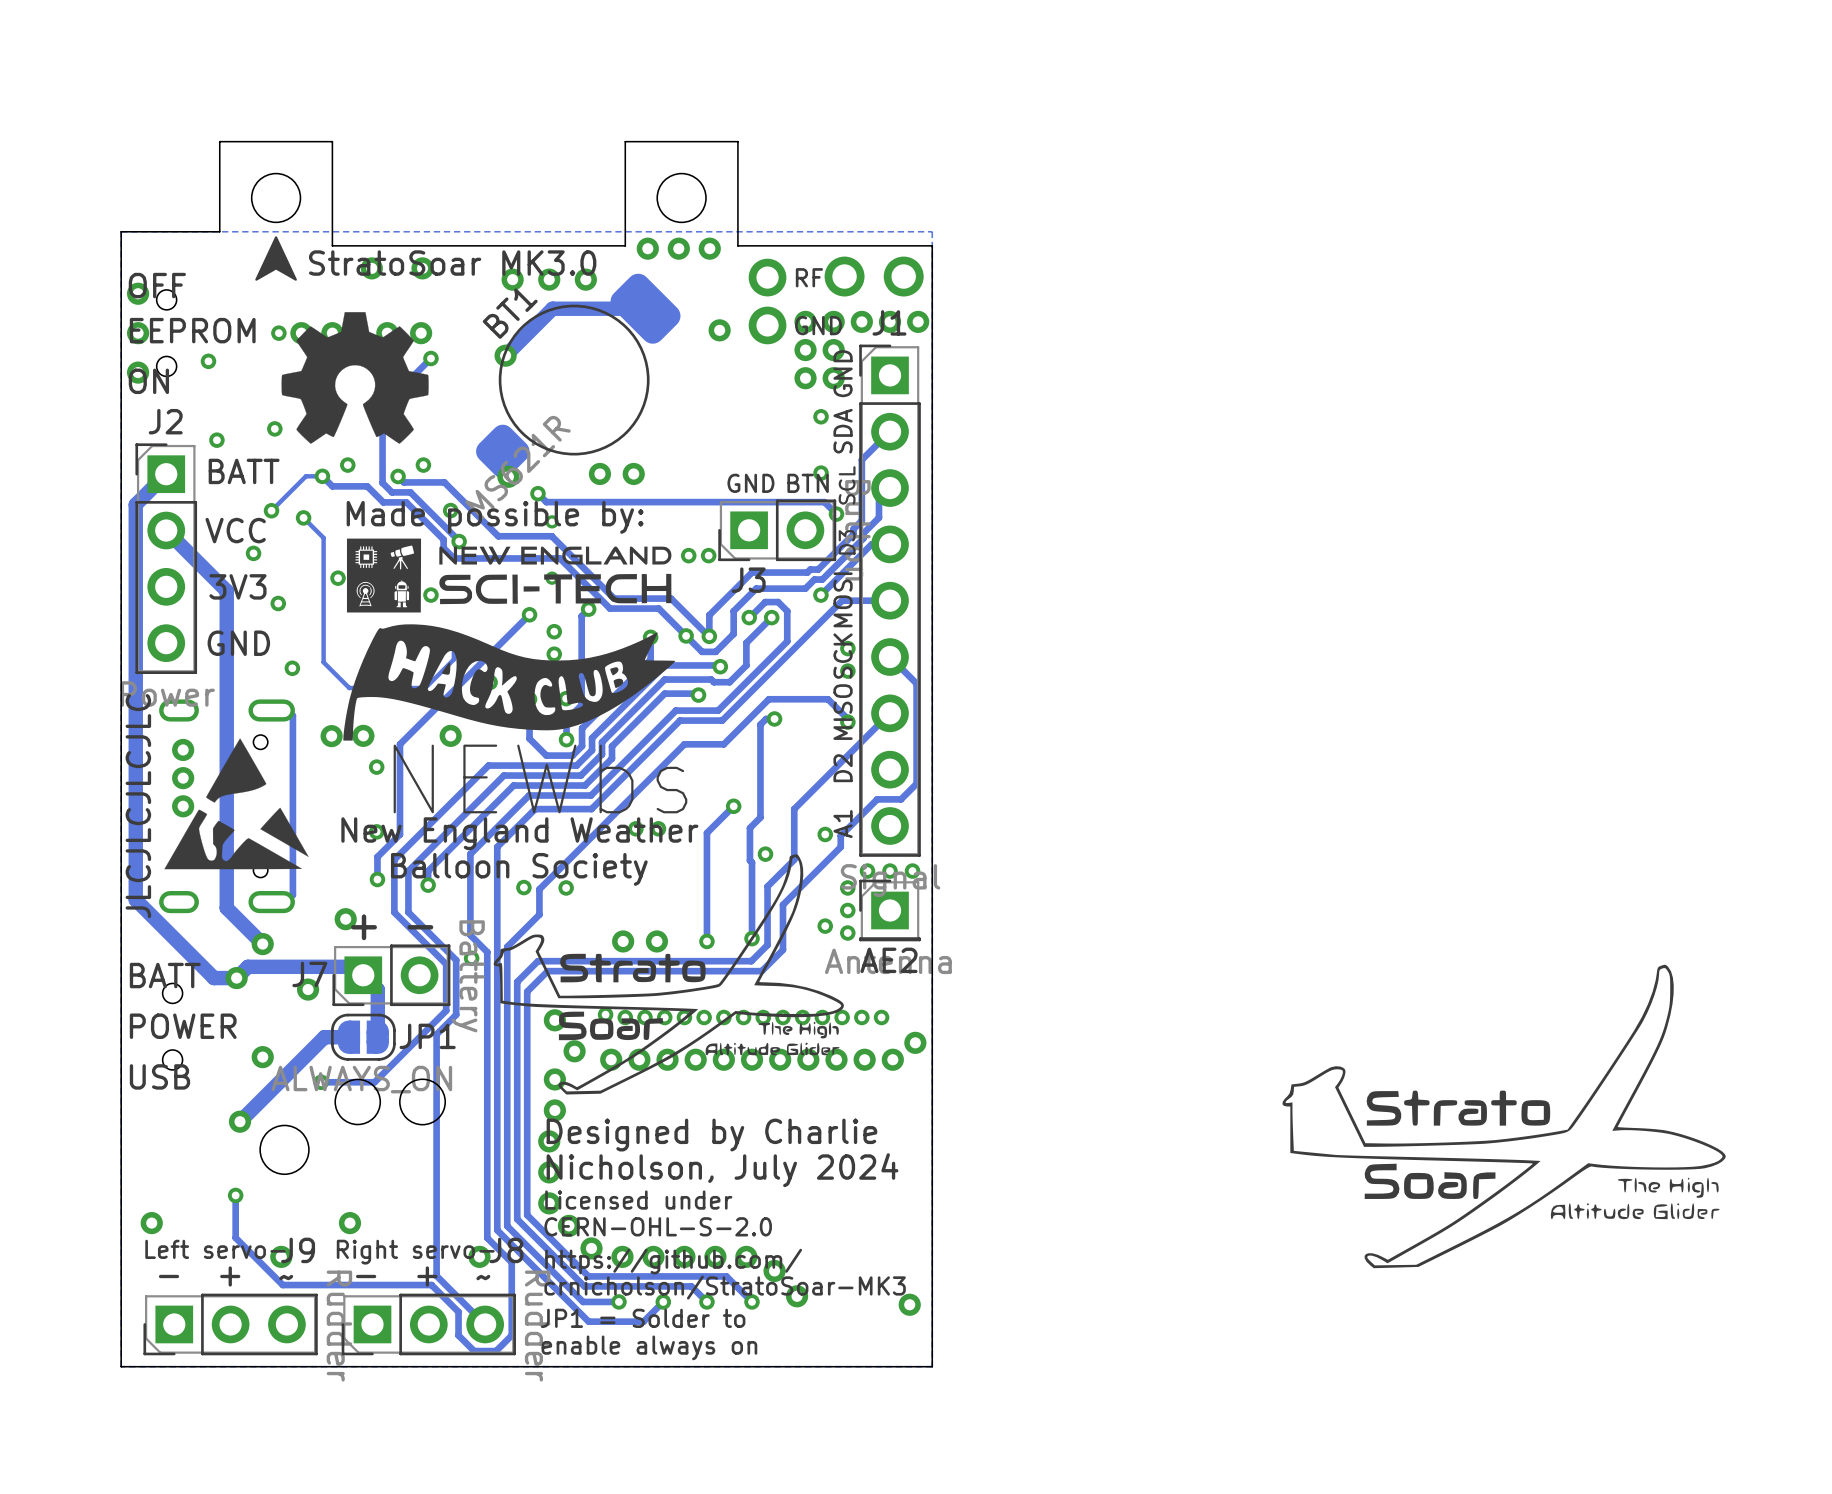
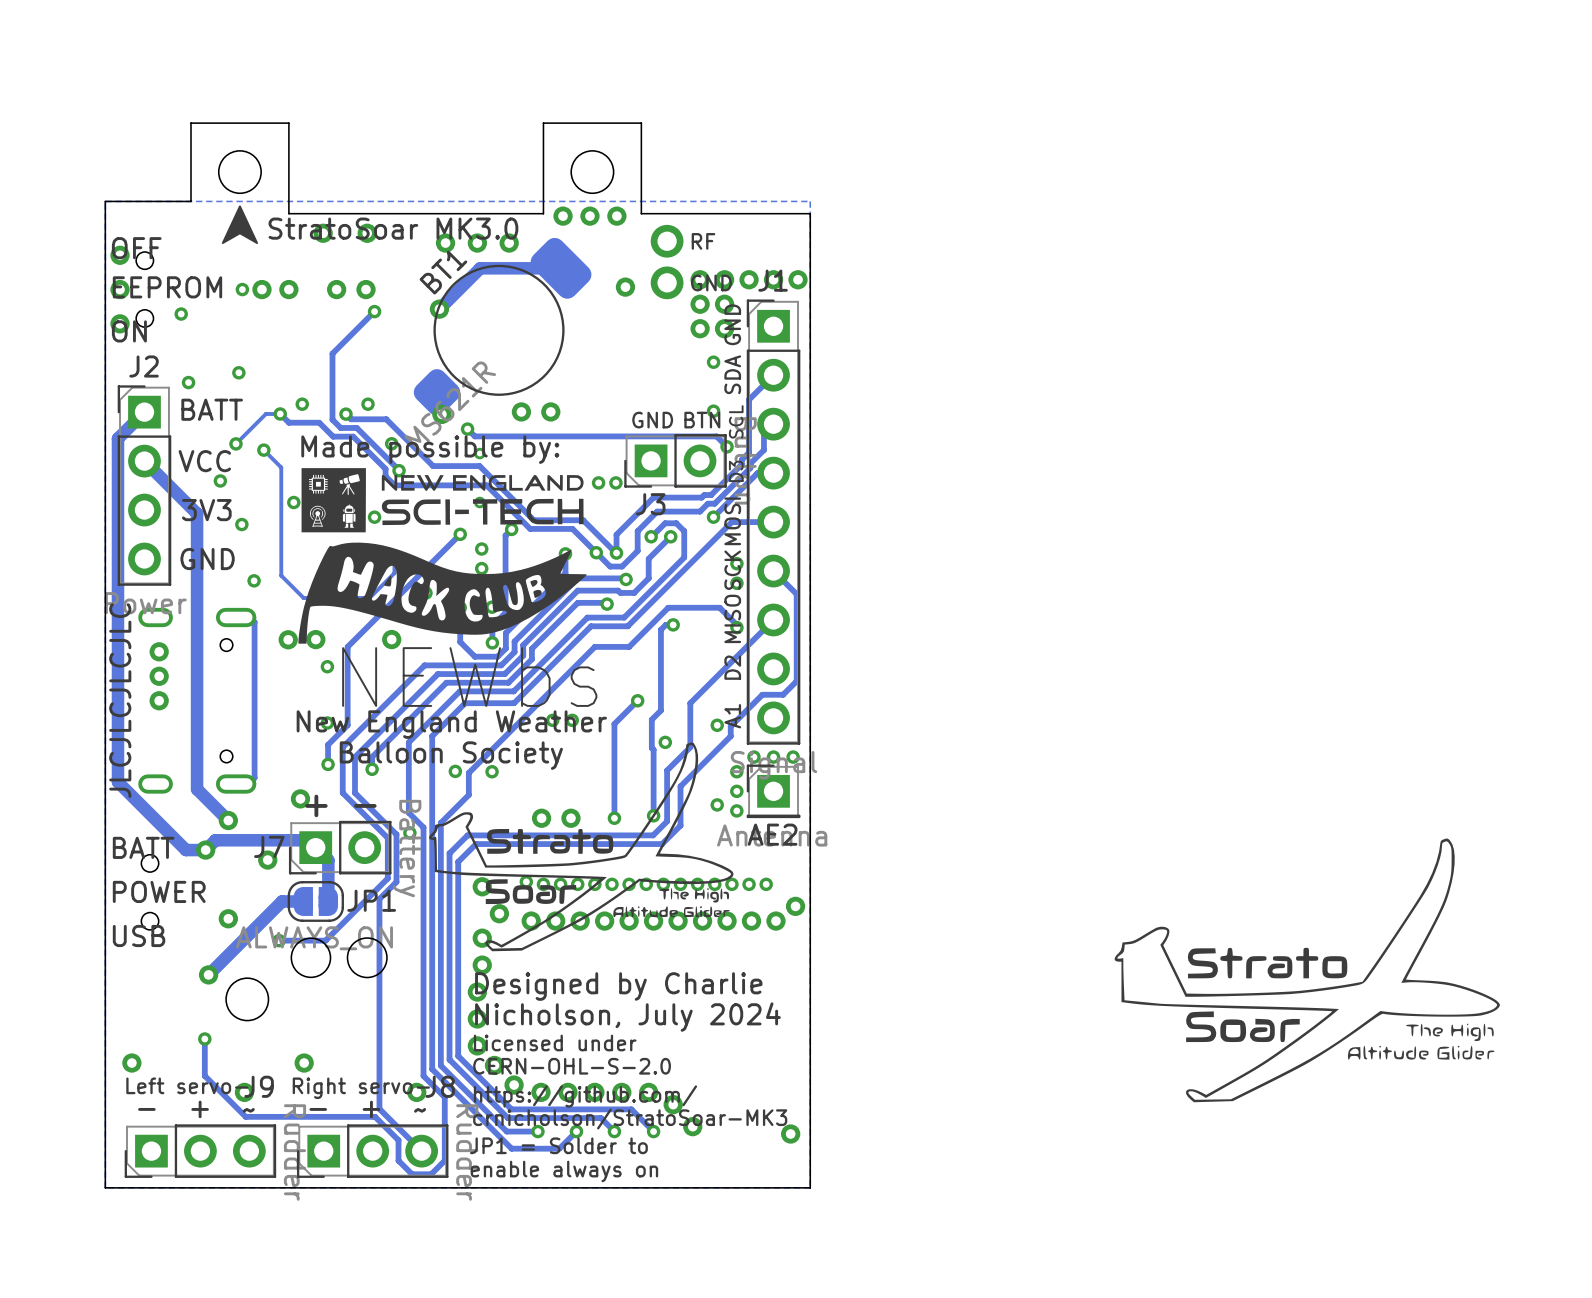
part: (874, 276) -> none
drawing: [281, 312, 429, 444] -> none
drawing: [164, 738, 309, 870] -> none

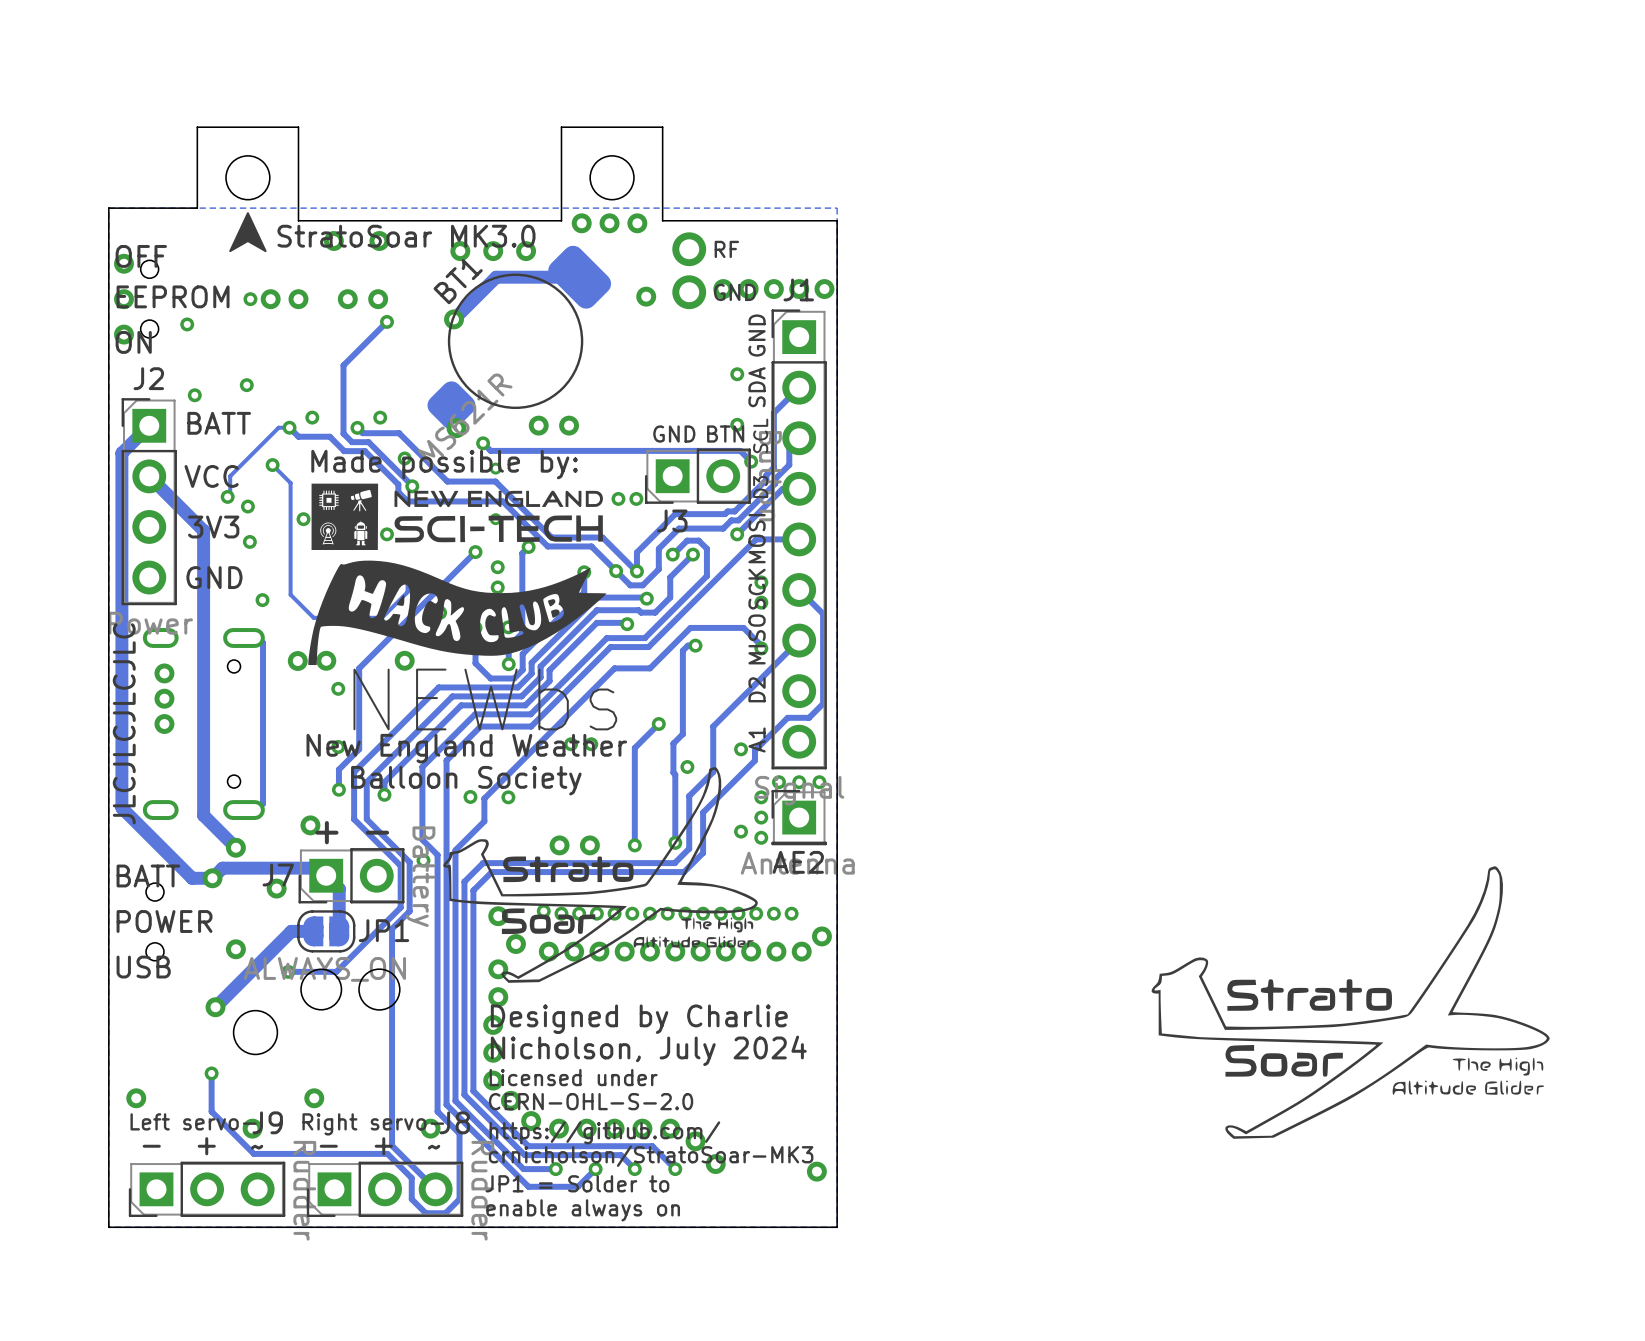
via: (700, 304) -> none
via: (724, 304) -> none
via: (700, 328) -> none
via: (724, 328) -> none
track: (269, 413) (265, 413) (235, 443) -> (278, 427) (230, 476) (230, 496)
via position: (235, 443) -> (247, 506)

